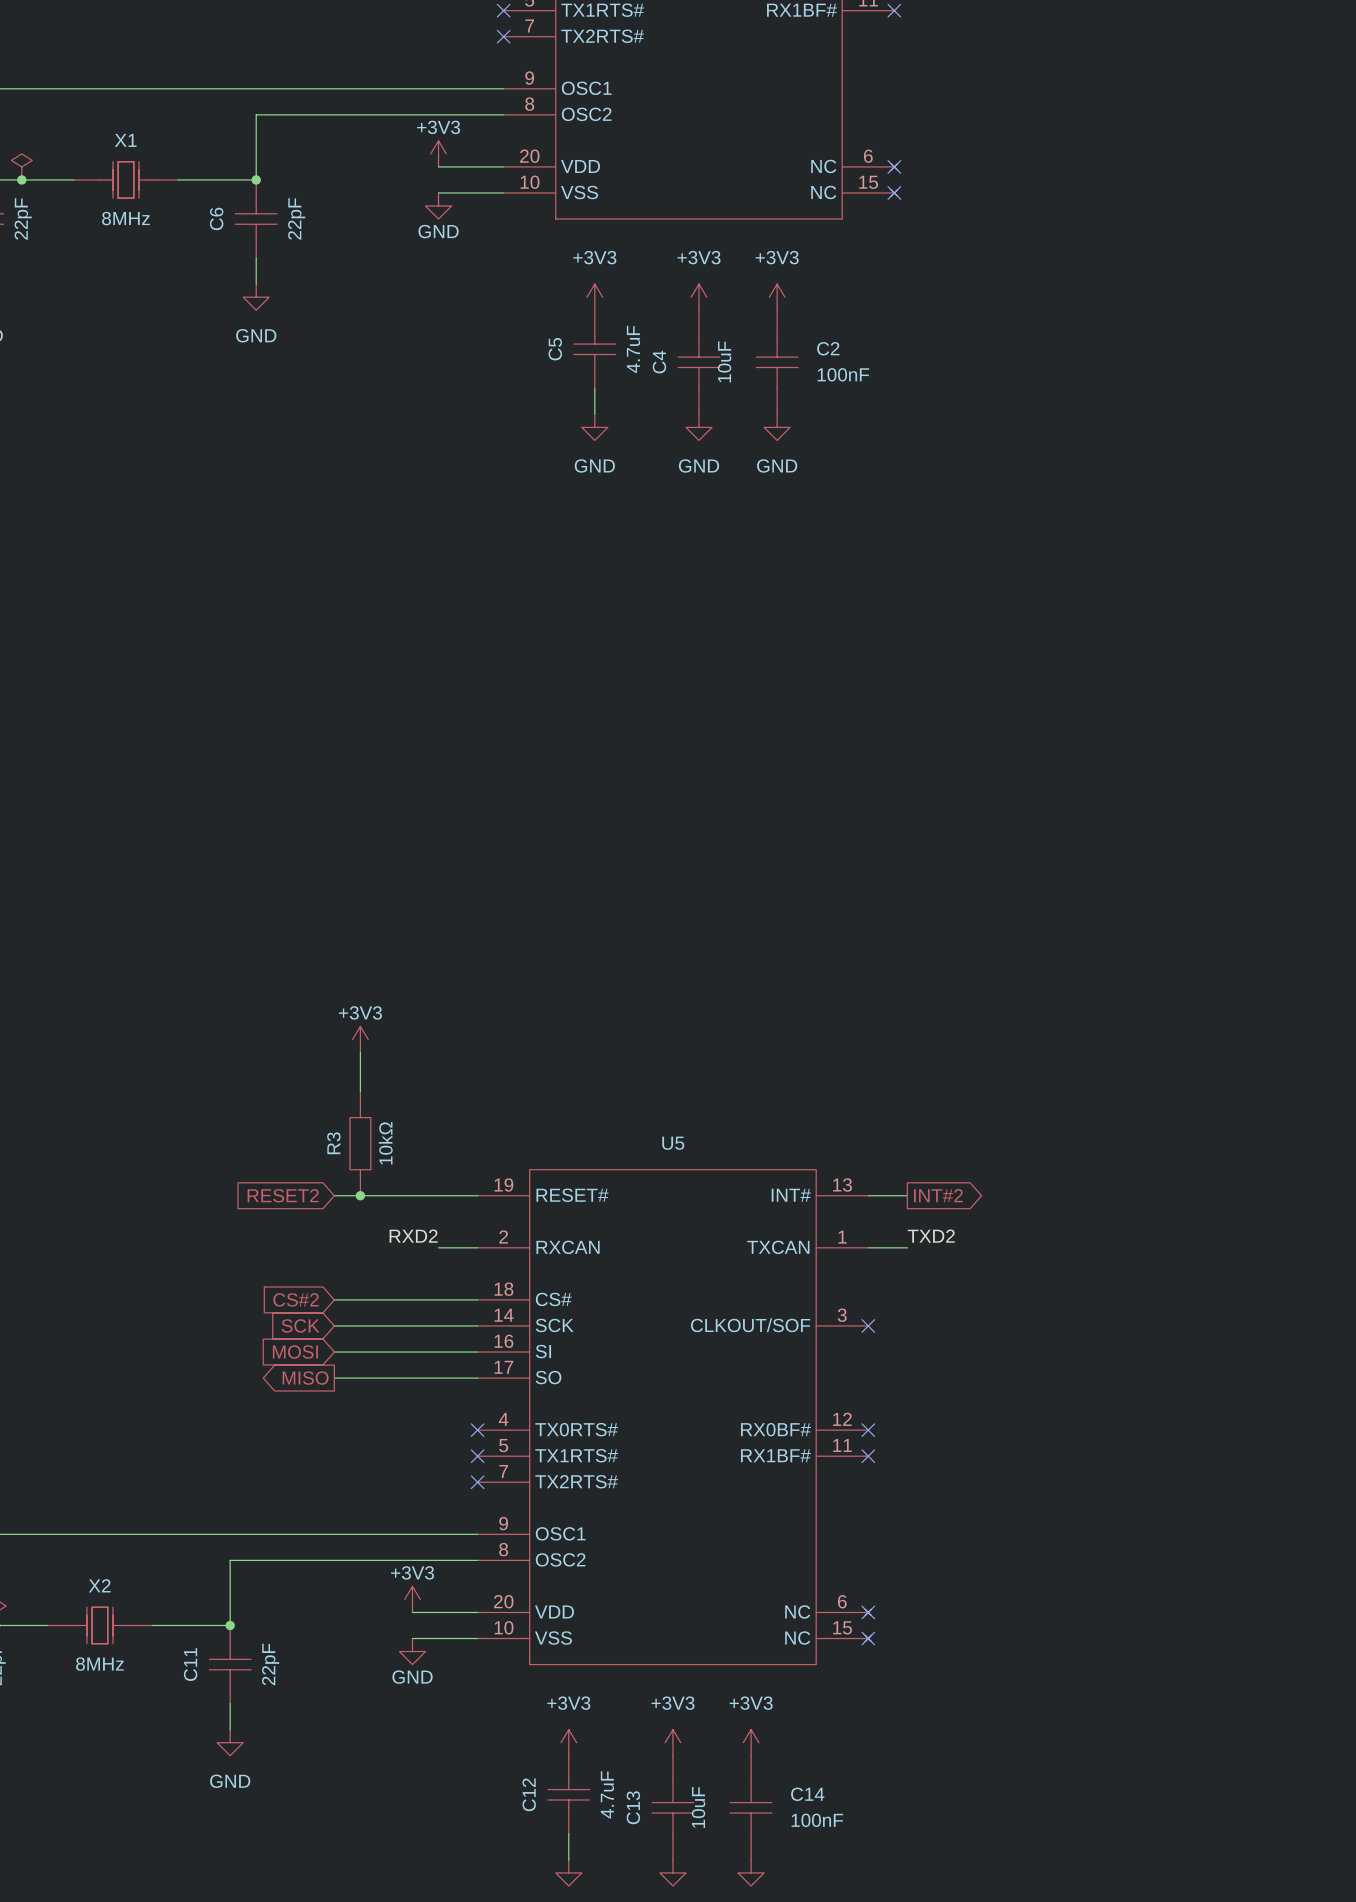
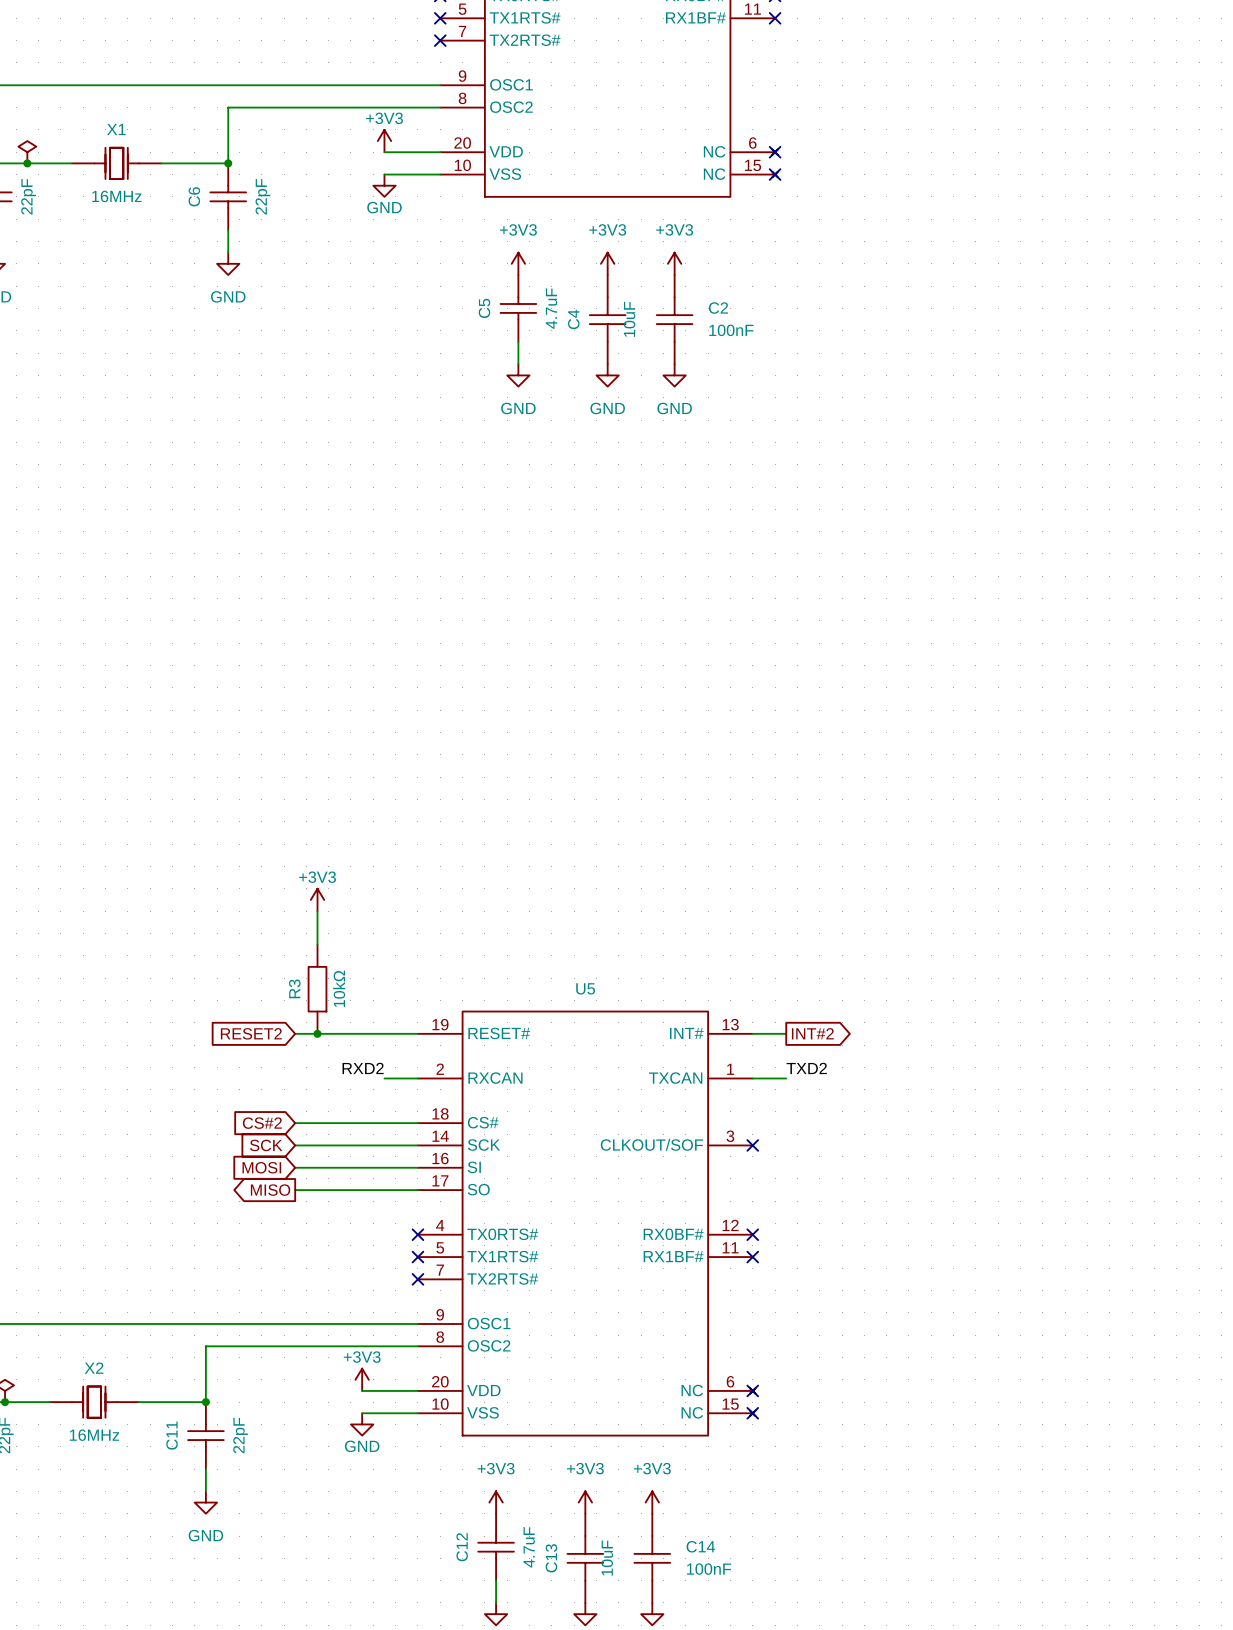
X1 value: 8MHz (125, 218) -> 16MHz (116, 196)
X2 value: 8MHz (99, 1664) -> 16MHz (94, 1435)

